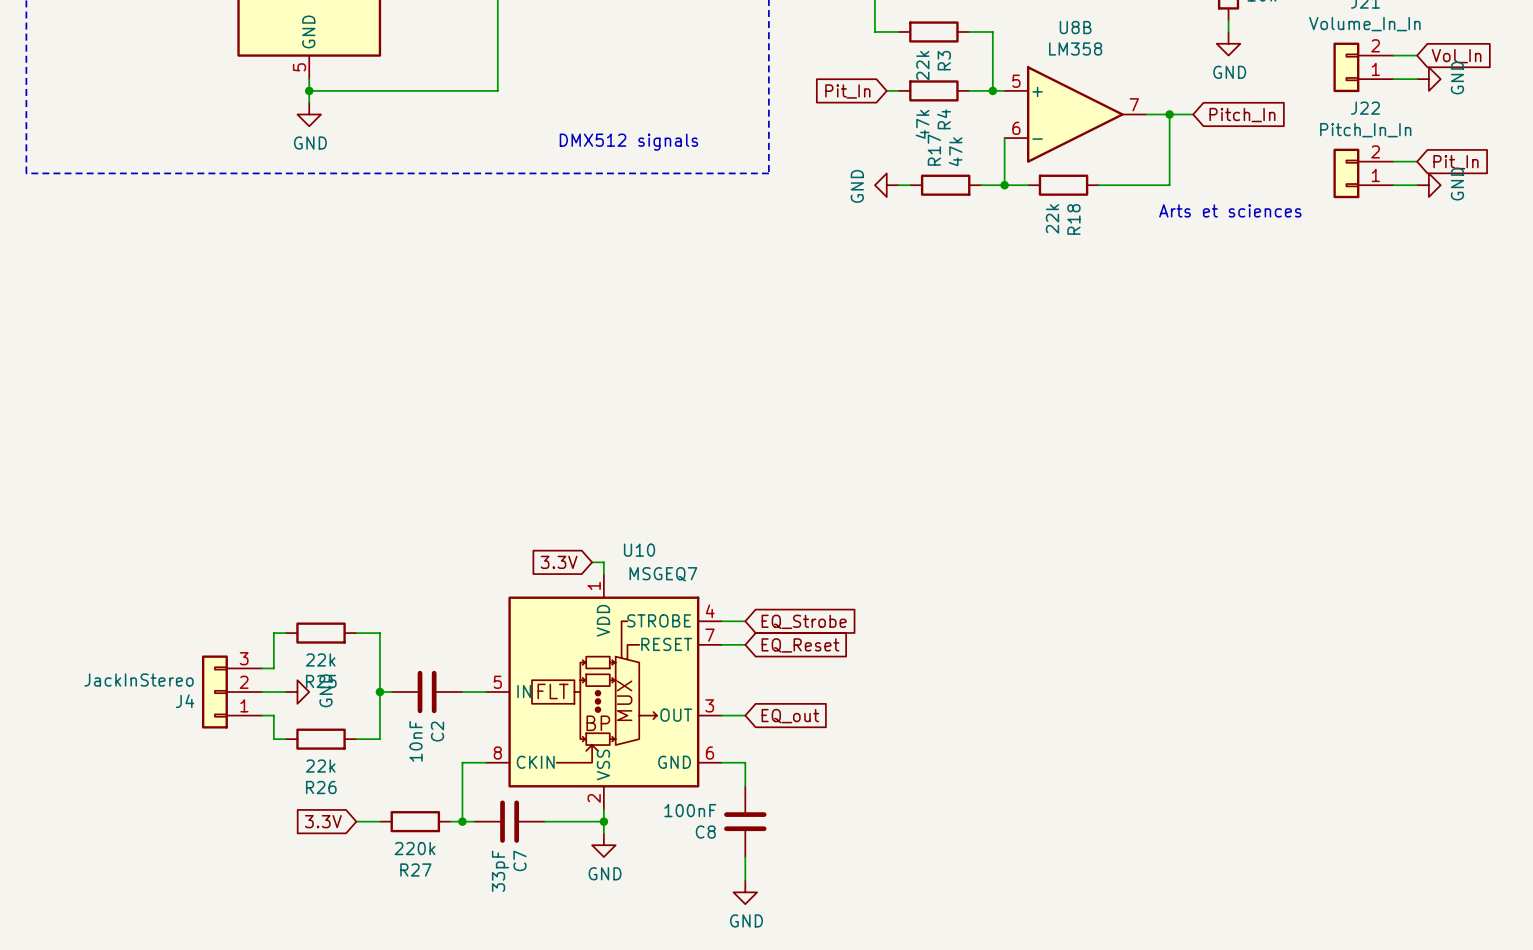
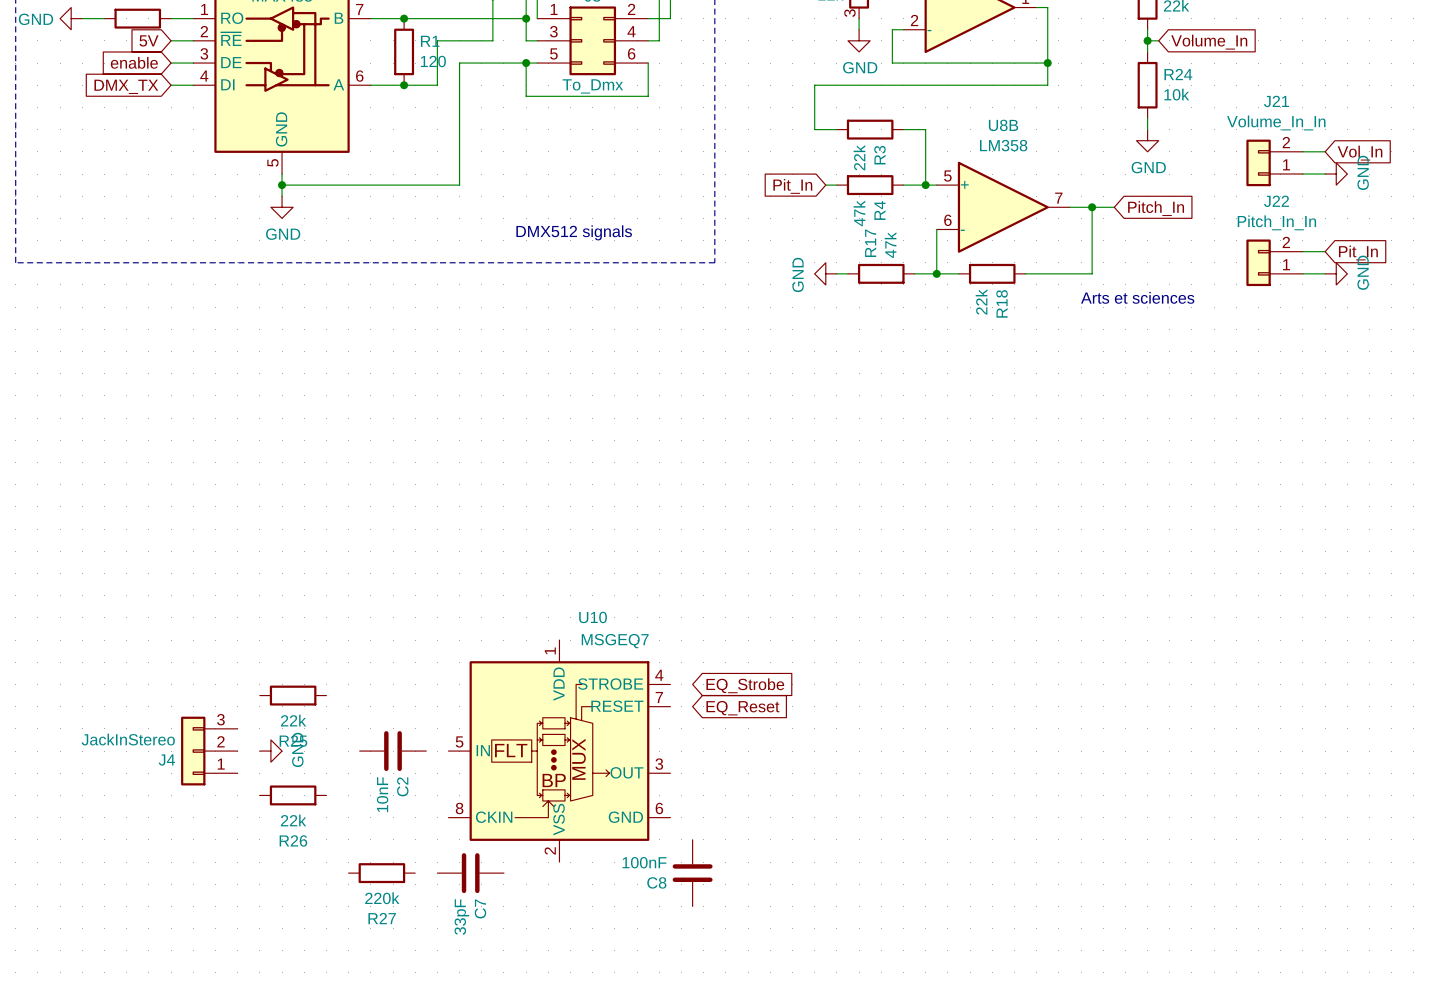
global label: 3.3V (559, 562) -> none
wire: (592, 562) (603, 562) (603, 574) -> none
wire: (721, 621) (745, 621) -> none
wire: (285, 633) (273, 633) (273, 668) (262, 668) -> none
wire: (356, 633) (379, 633) (379, 739) (356, 739) -> none
wire: (721, 644) (745, 644) -> none
wire: (262, 692) (285, 692) -> none
wire: (379, 692) (391, 692) -> none
junction: (379, 692) -> none
wire: (462, 692) (486, 692) -> none
wire: (262, 715) (273, 715) (273, 739) (285, 739) -> none
wire: (721, 715) (745, 715) -> none
global label: EQ_out (790, 716) -> none
wire: (486, 762) (462, 762) (462, 821) -> none
wire: (721, 762) (745, 762) (745, 786) -> none
wire: (603, 809) (603, 833) -> none
global label: 3.3V (323, 821) -> none
wire: (356, 821) (379, 821) -> none
wire: (450, 821) (474, 821) -> none
junction: (462, 821) -> none
wire: (544, 821) (603, 821) -> none
junction: (603, 821) -> none
power symbol: GND (603, 845) -> none
wire: (745, 857) (745, 880) -> none
power symbol: GND (745, 892) -> none

